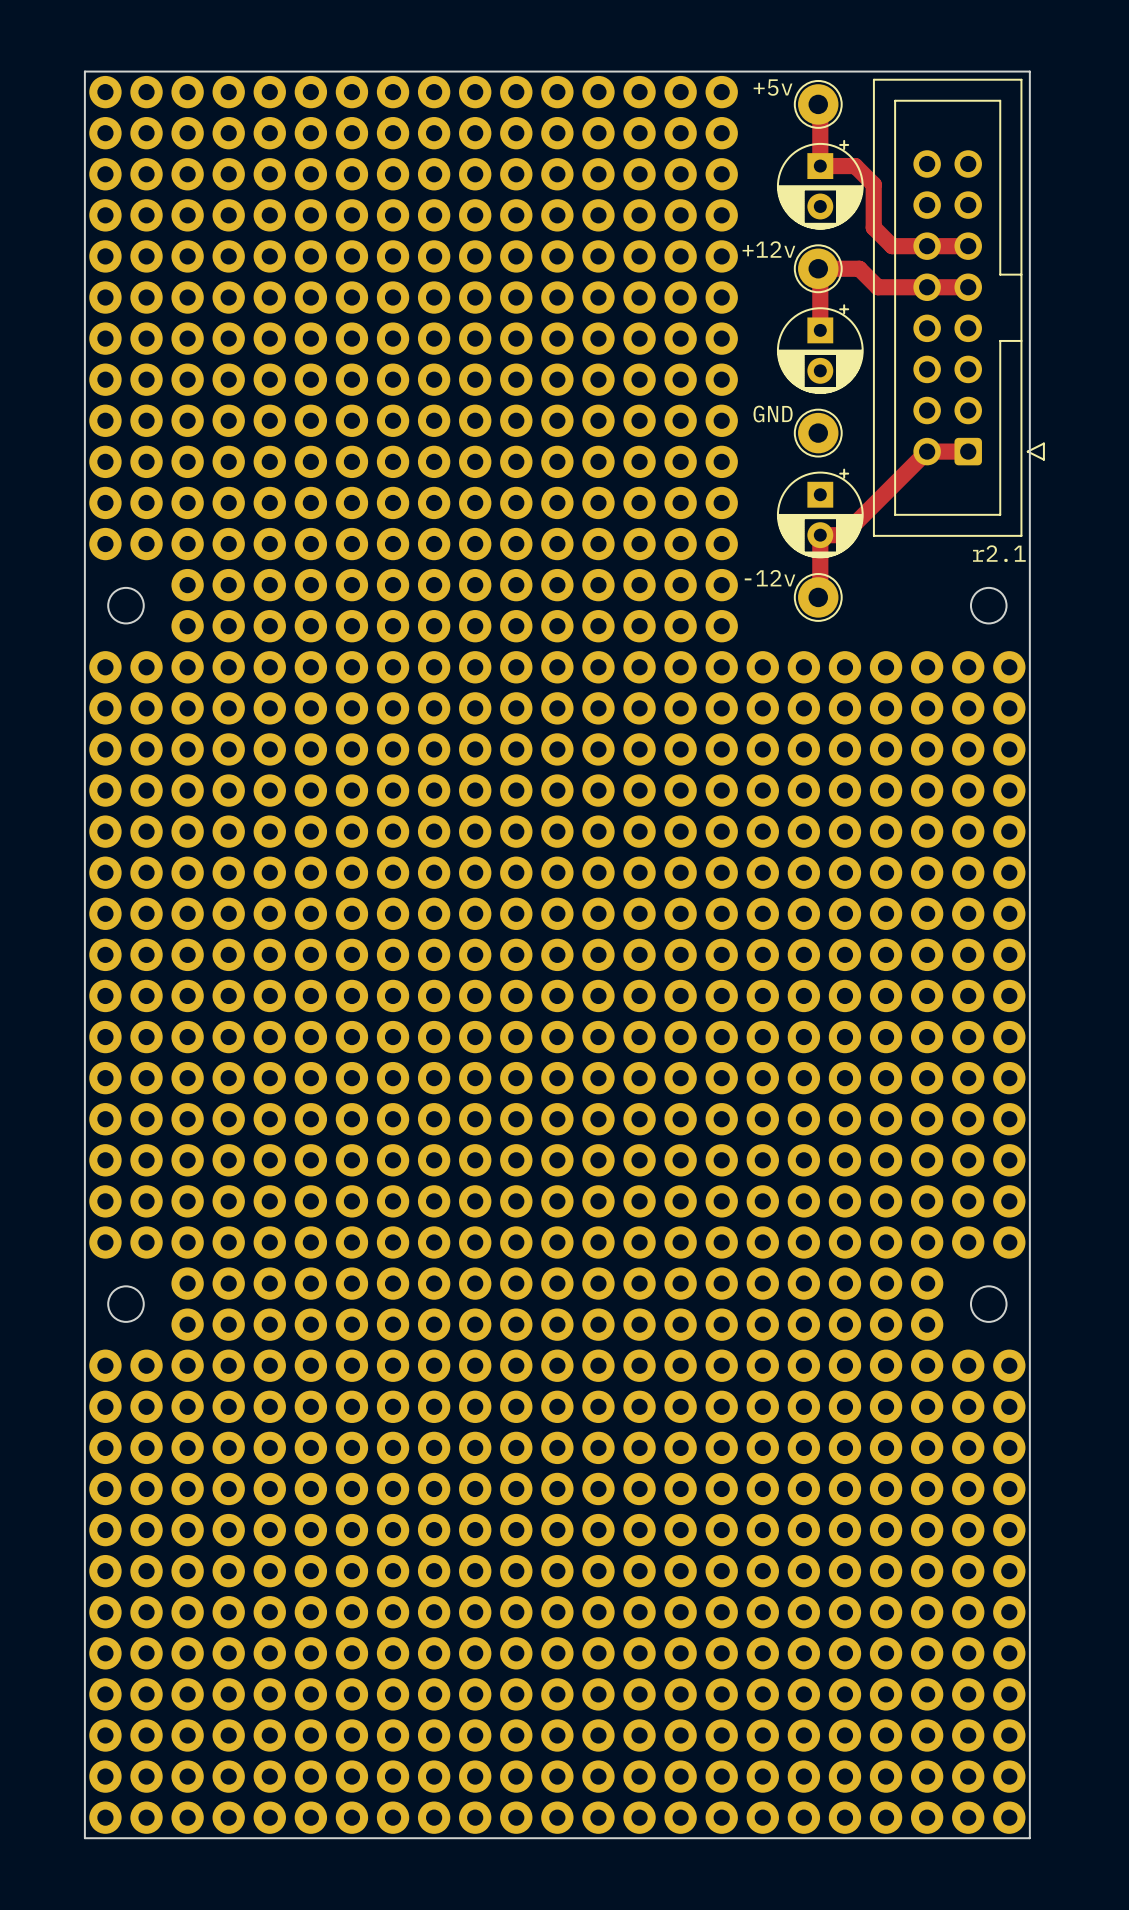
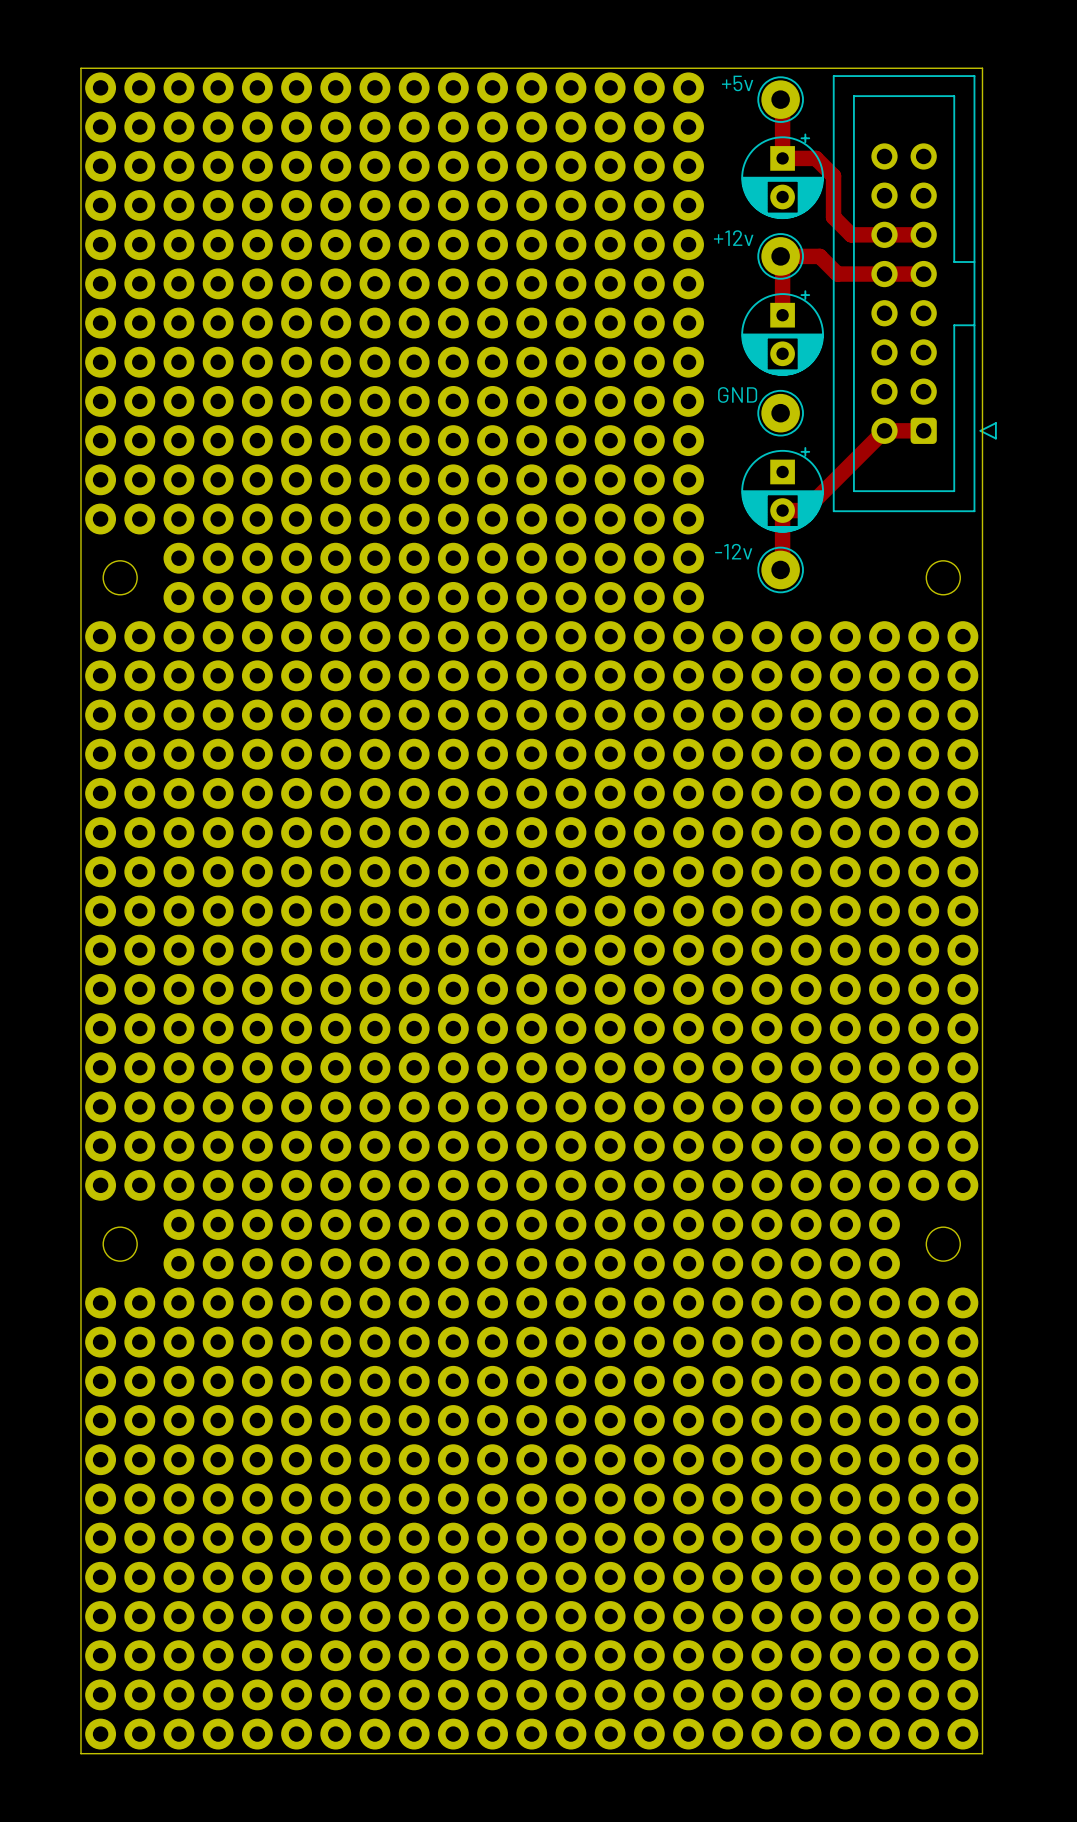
text: r2.1 (999, 553) -> none

